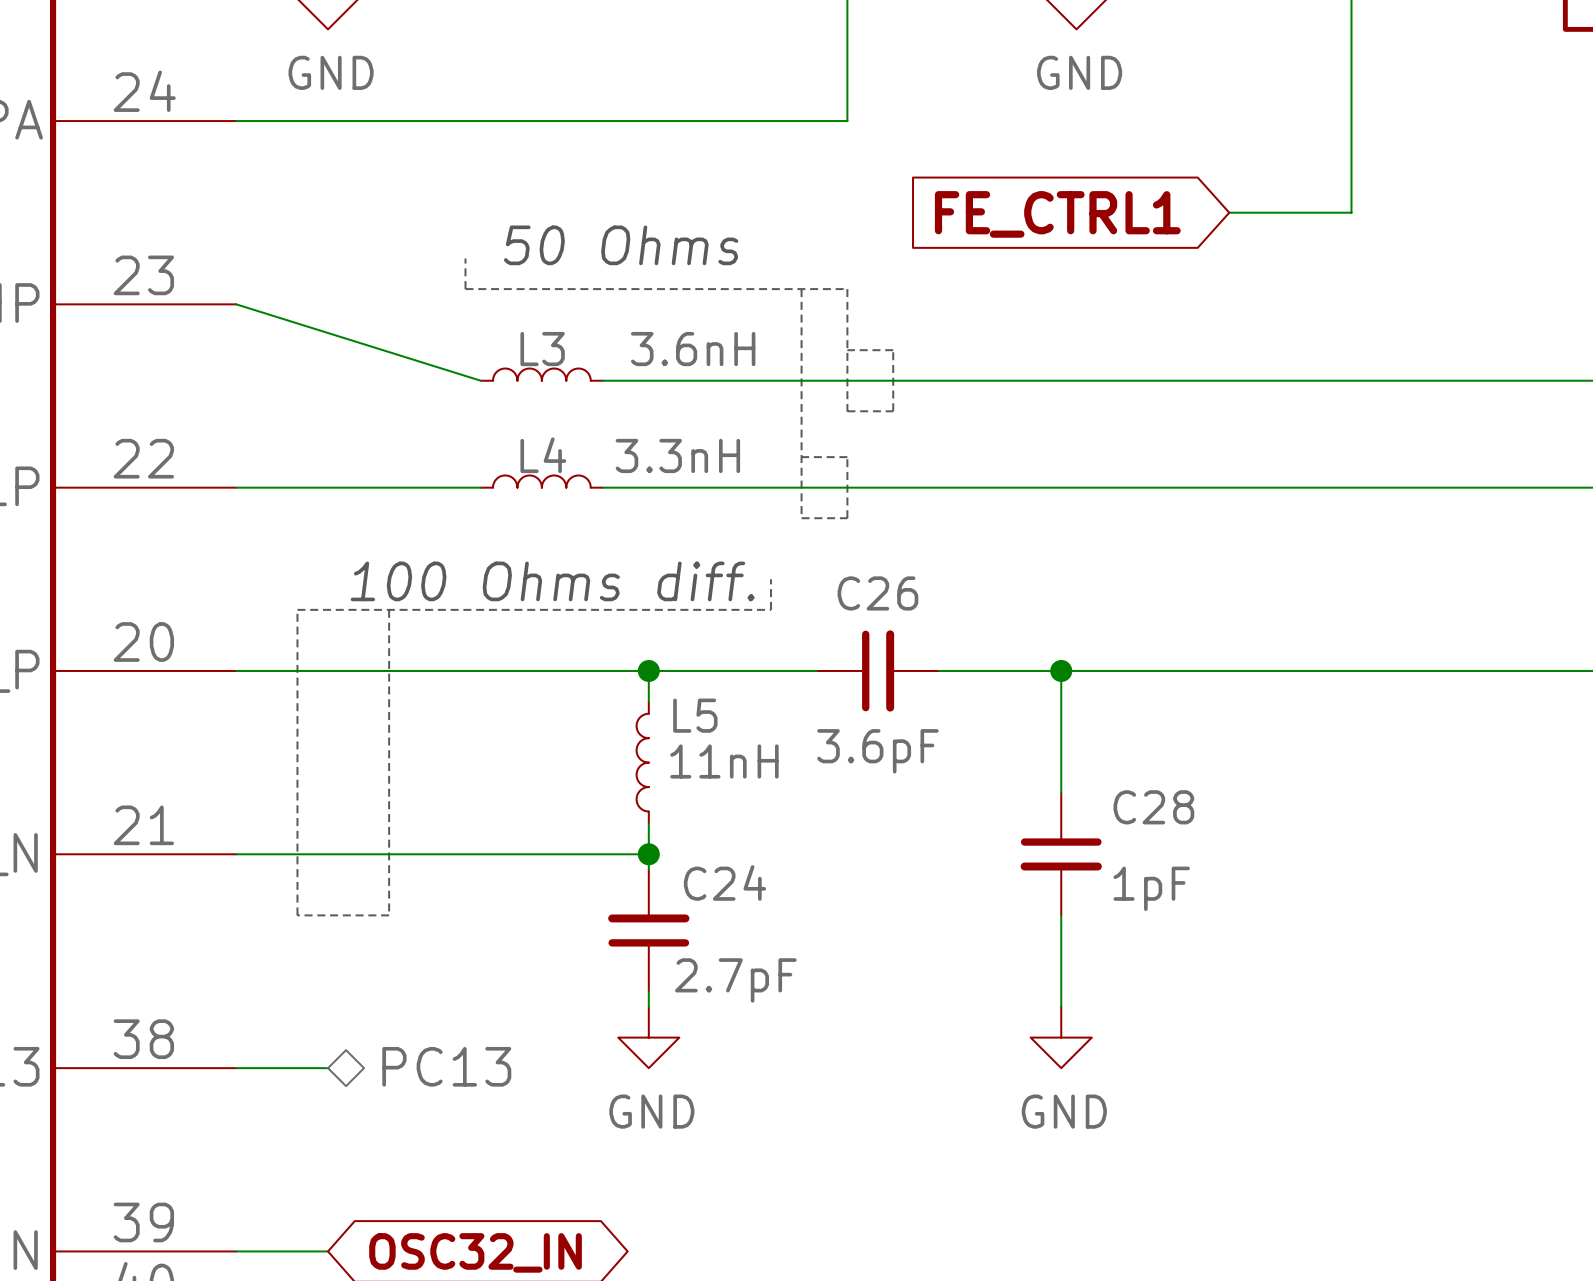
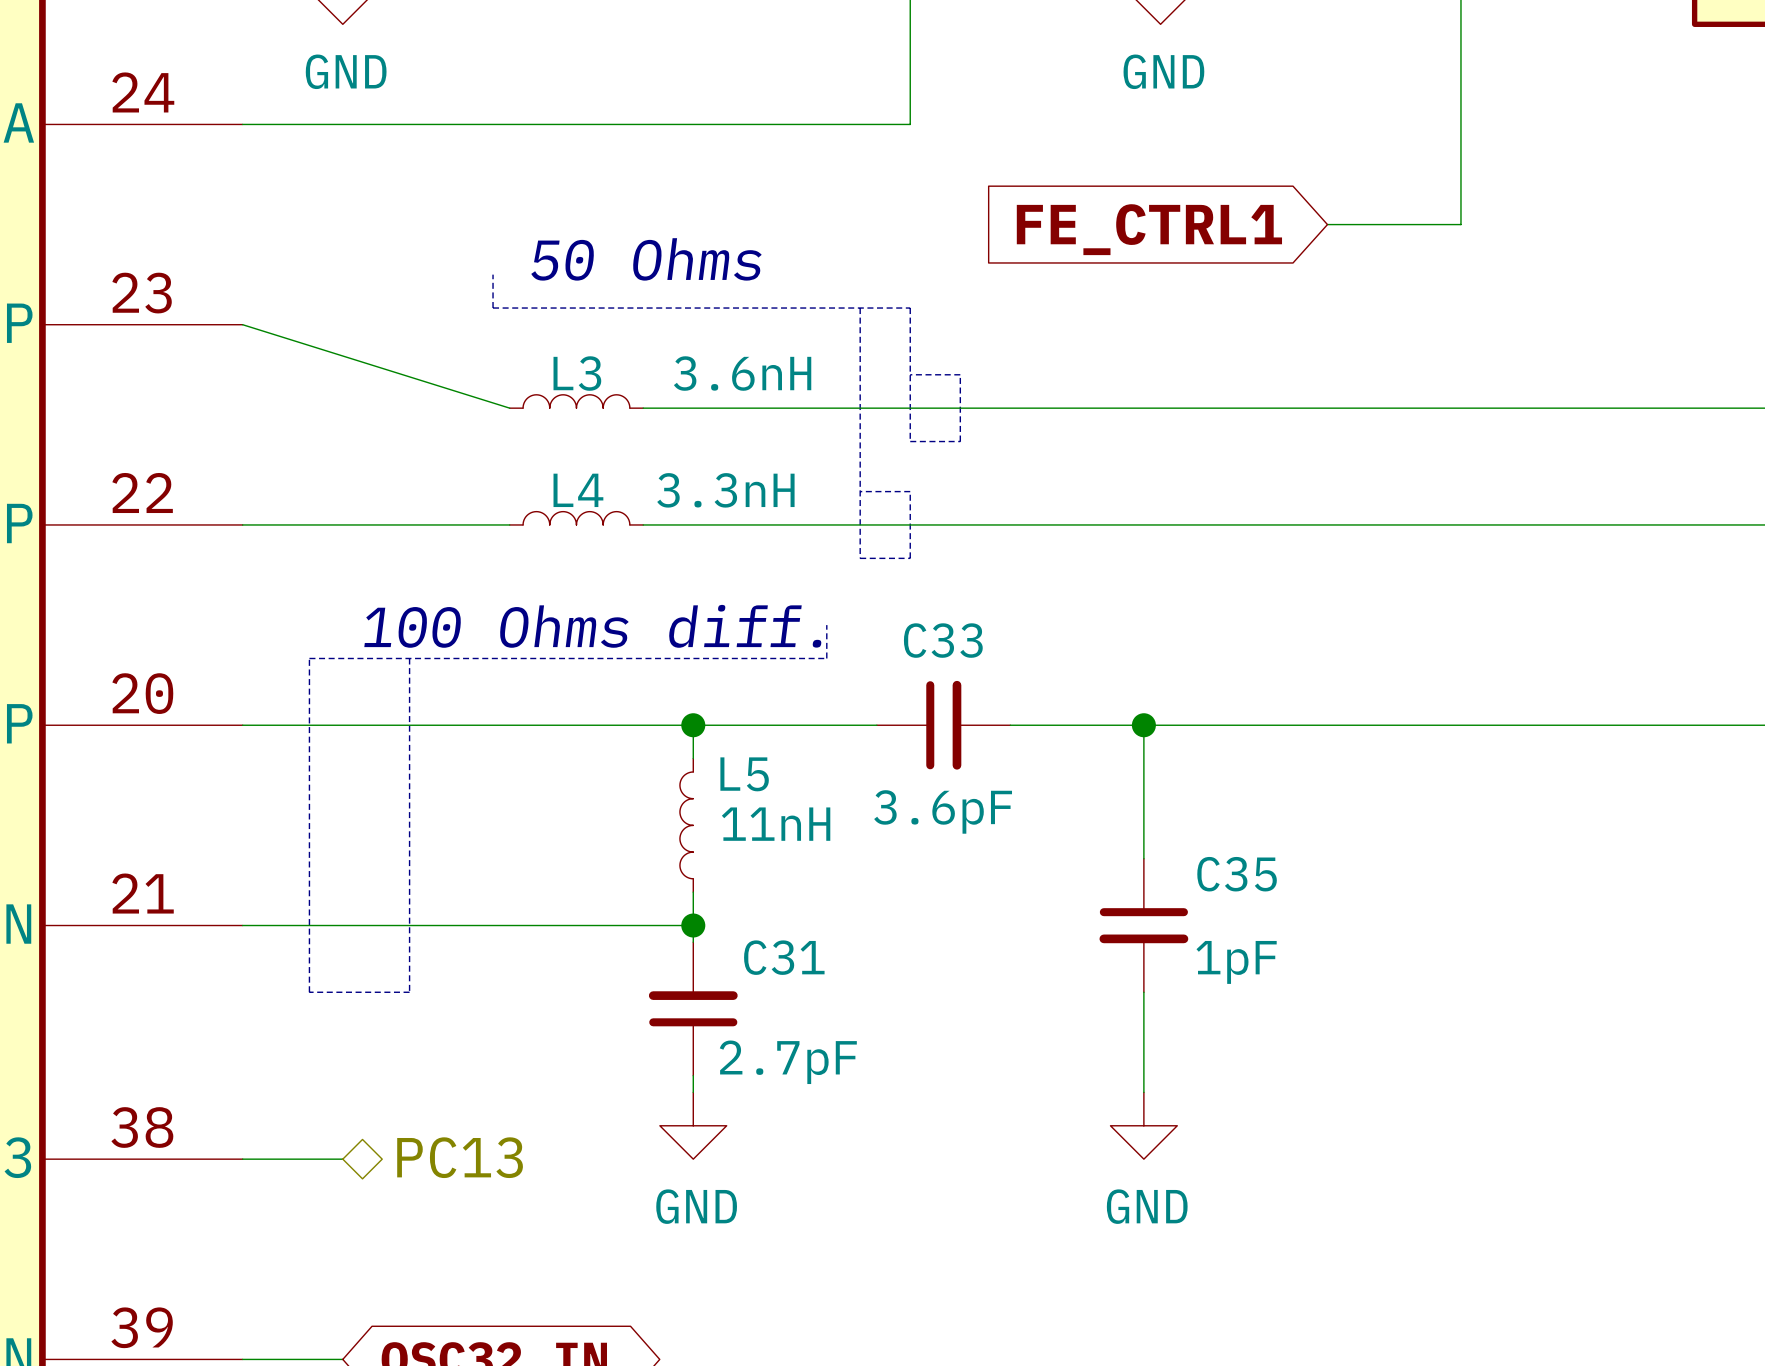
C26 name: C26 (877, 593) -> C33 (943, 640)
C28 name: C28 (1153, 807) -> C35 (1237, 874)
C24 name: C24 (724, 882) -> C31 (784, 957)

